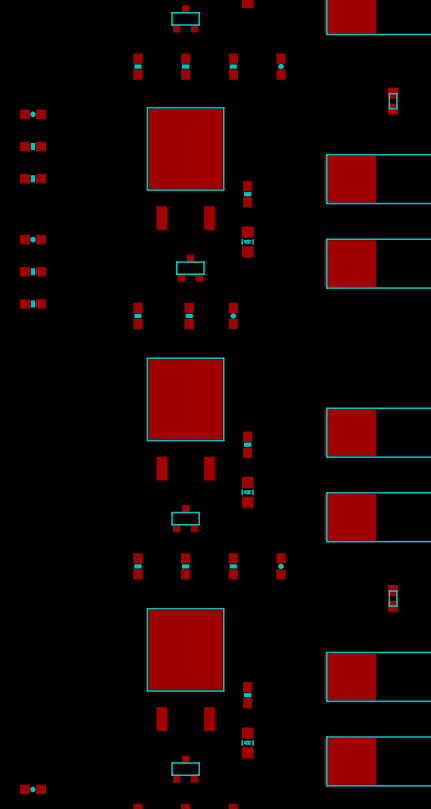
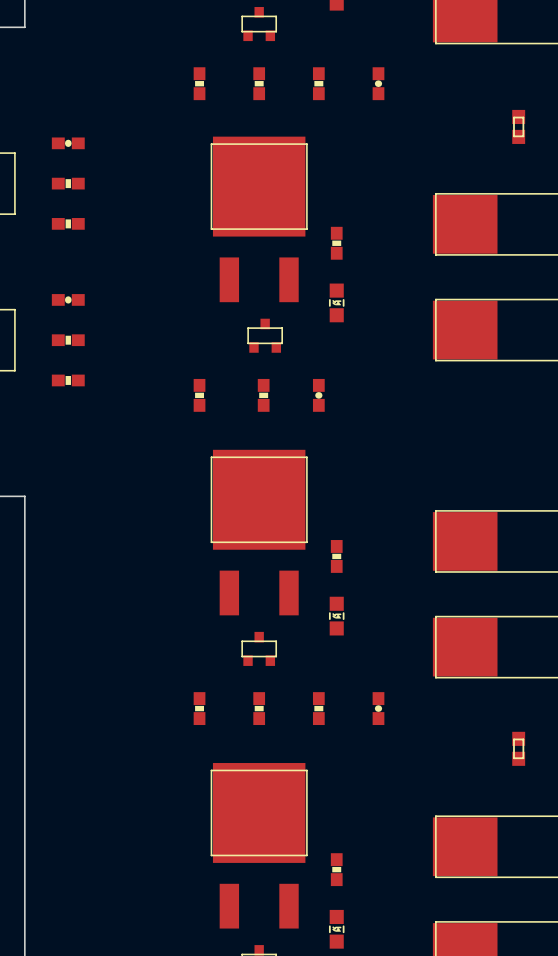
part footprint: [146, 107, 225, 231] -> [210, 136, 308, 303]
part footprint: [146, 357, 225, 481] -> [210, 449, 308, 616]
part footprint: [146, 608, 225, 731] -> [210, 763, 308, 929]

